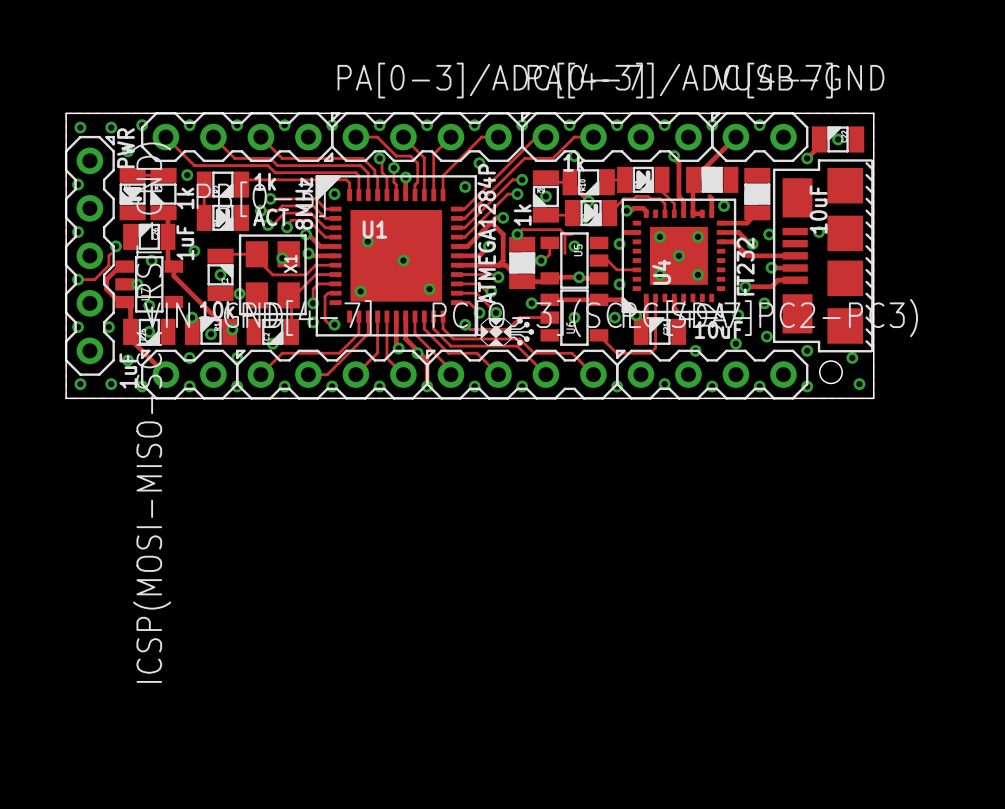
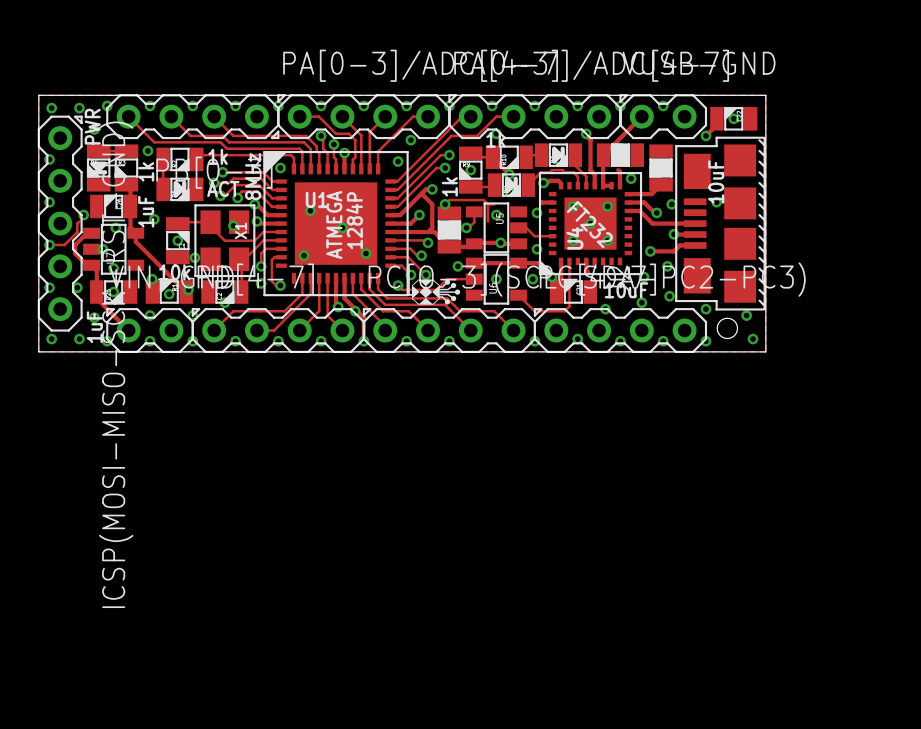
text: ATMEGA1284P (486, 233) -> none
text: none -> 1284P (354, 220)
text: none -> ATMEGA (334, 225)
text rotation: 0° (745, 266) -> 135° clockwise (589, 224)

